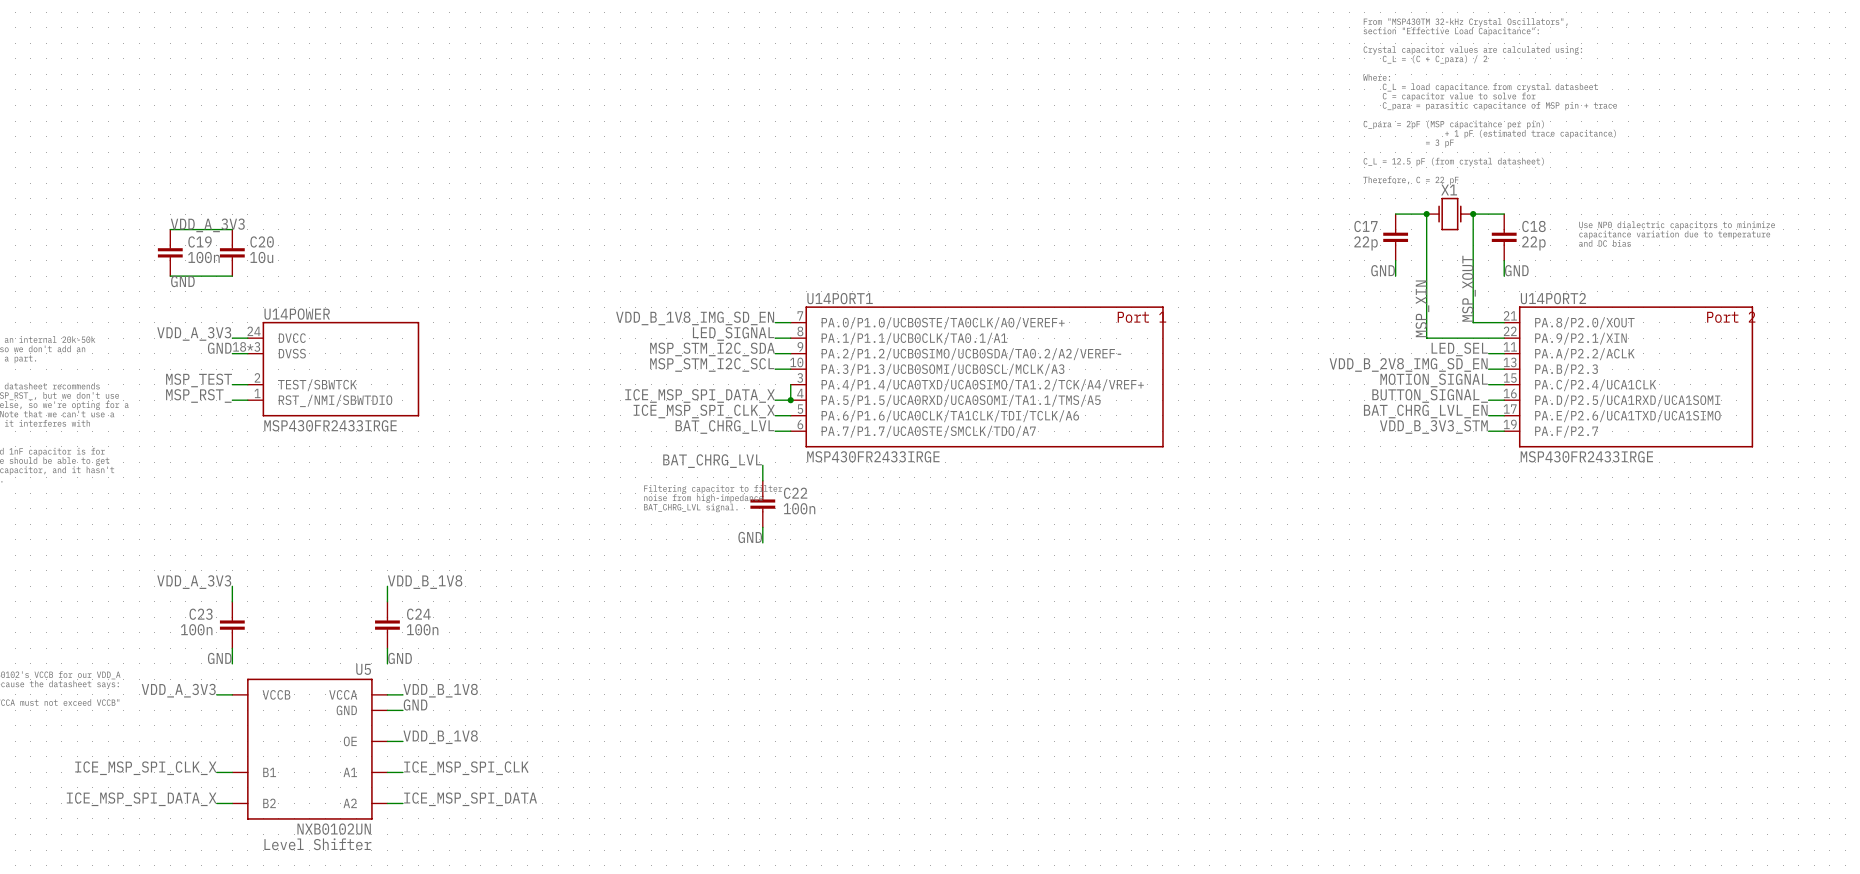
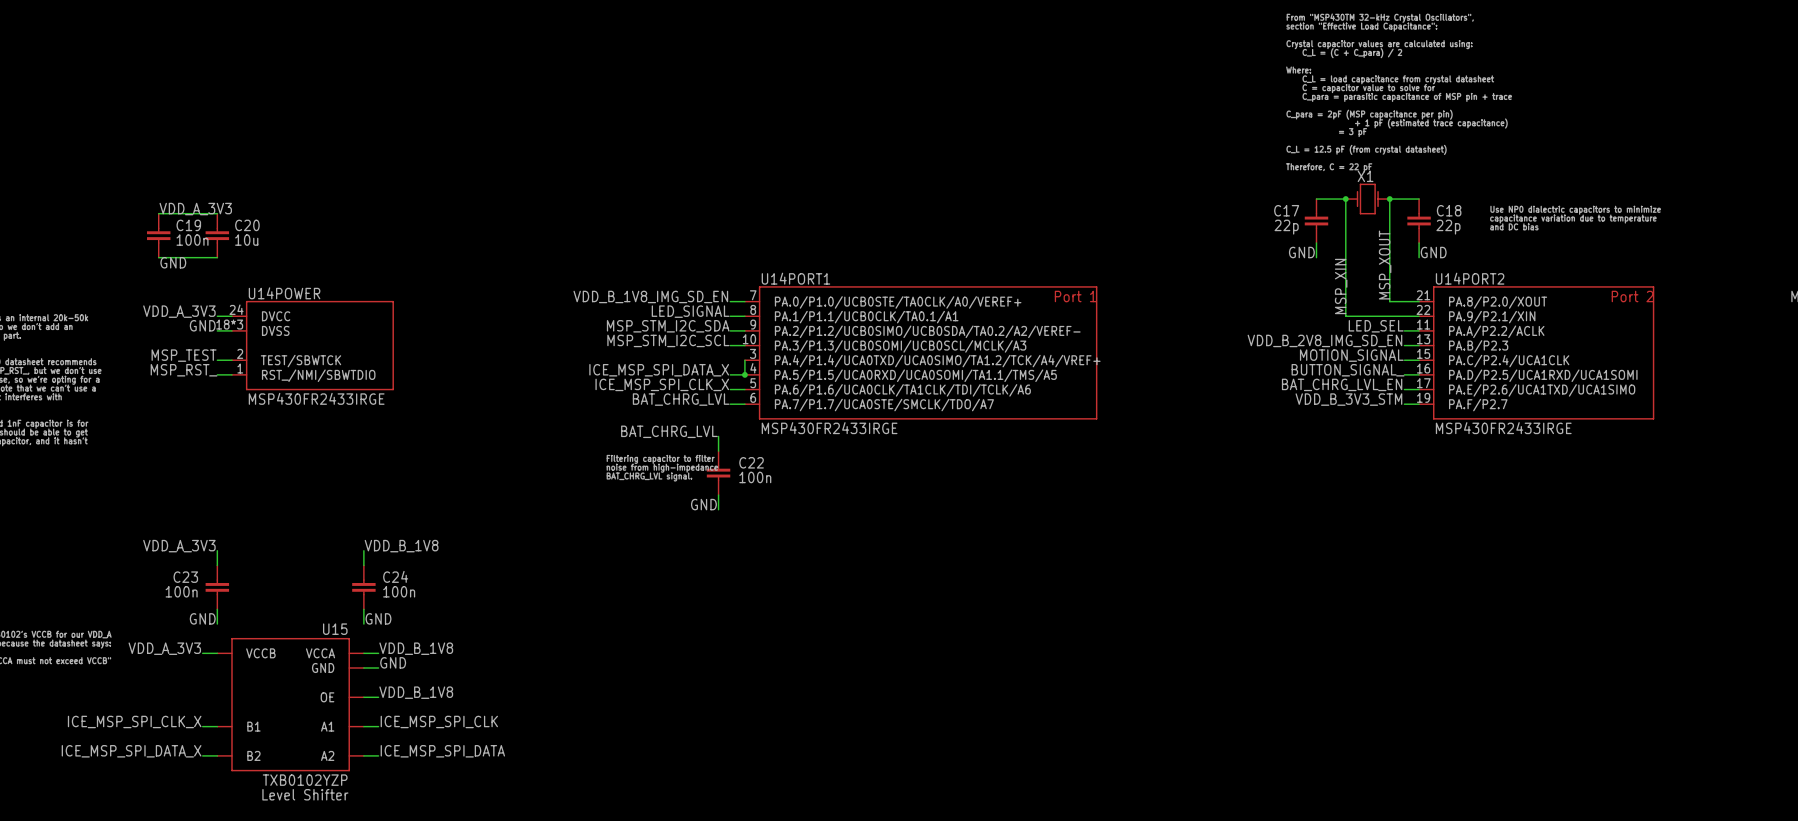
U5 name: U5 (363, 669) -> U15 (335, 629)
U5 text: NXB0102UN (334, 829) -> TXB0102YZP (305, 780)

